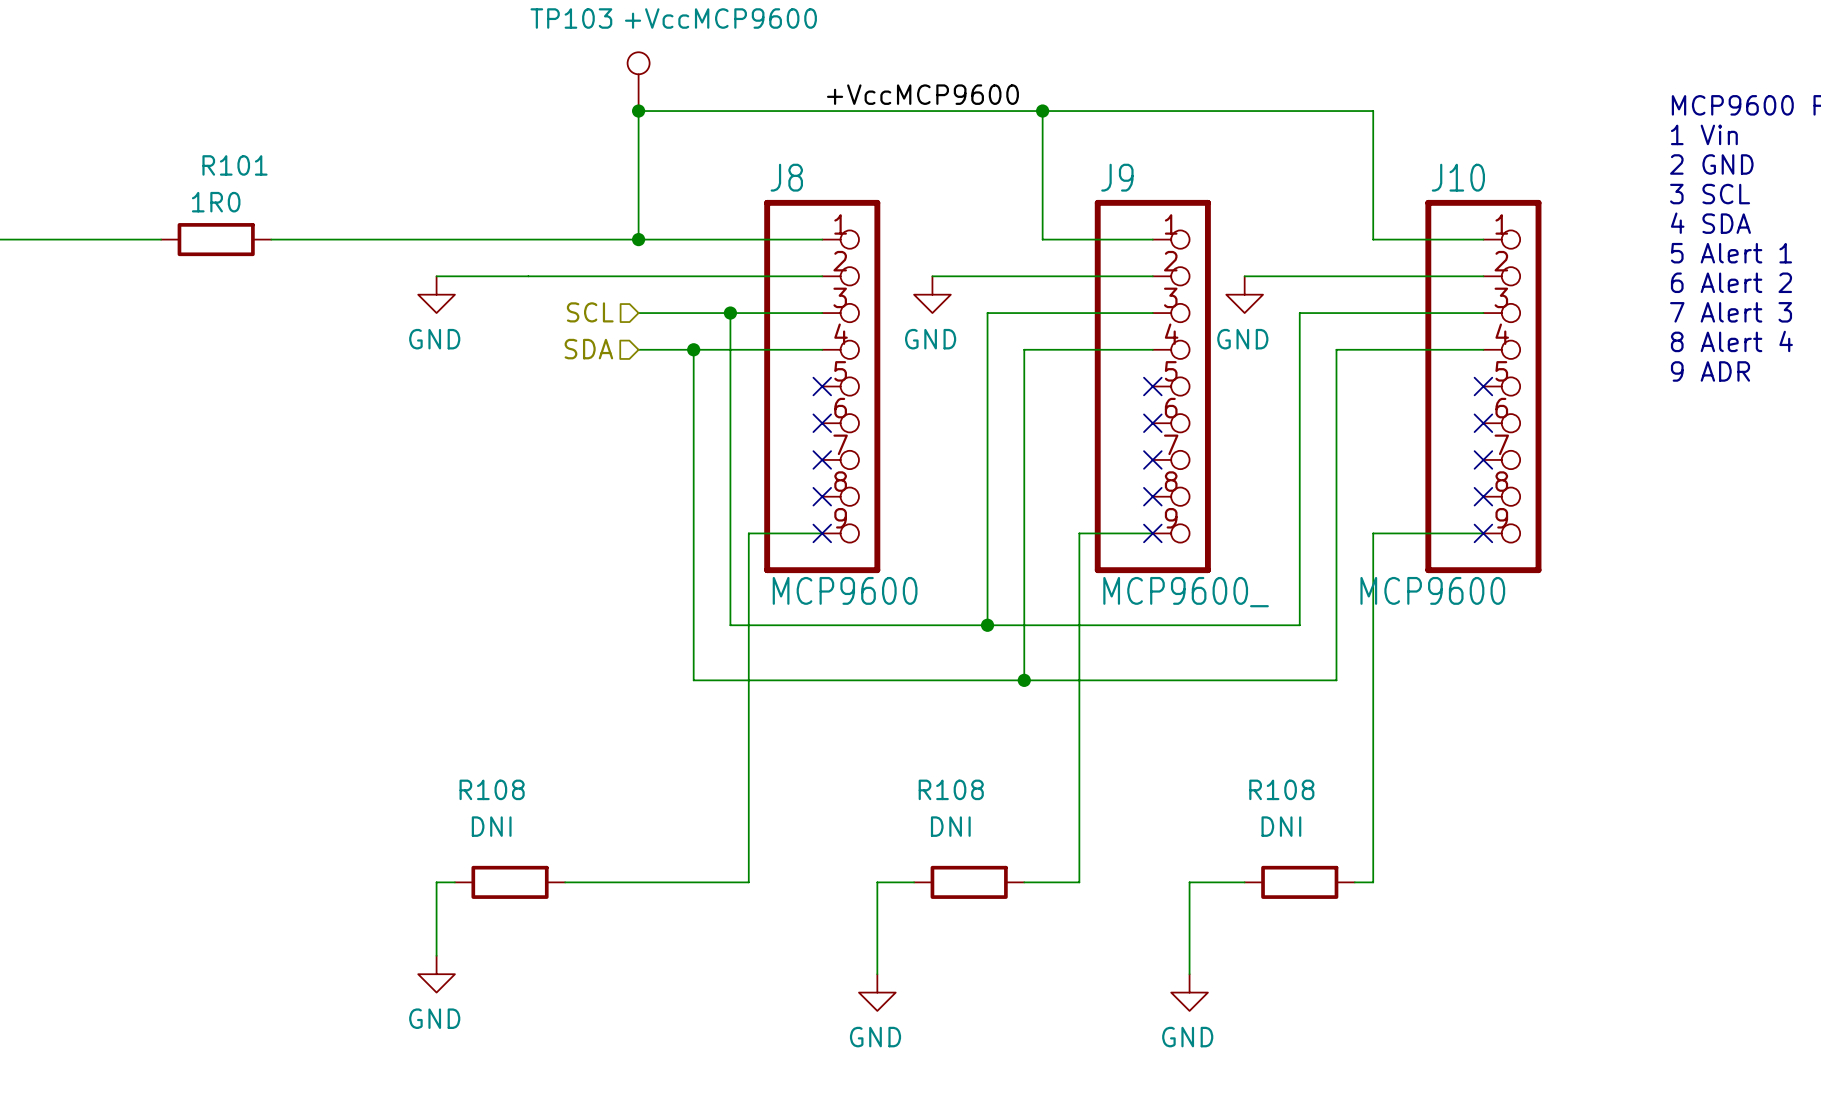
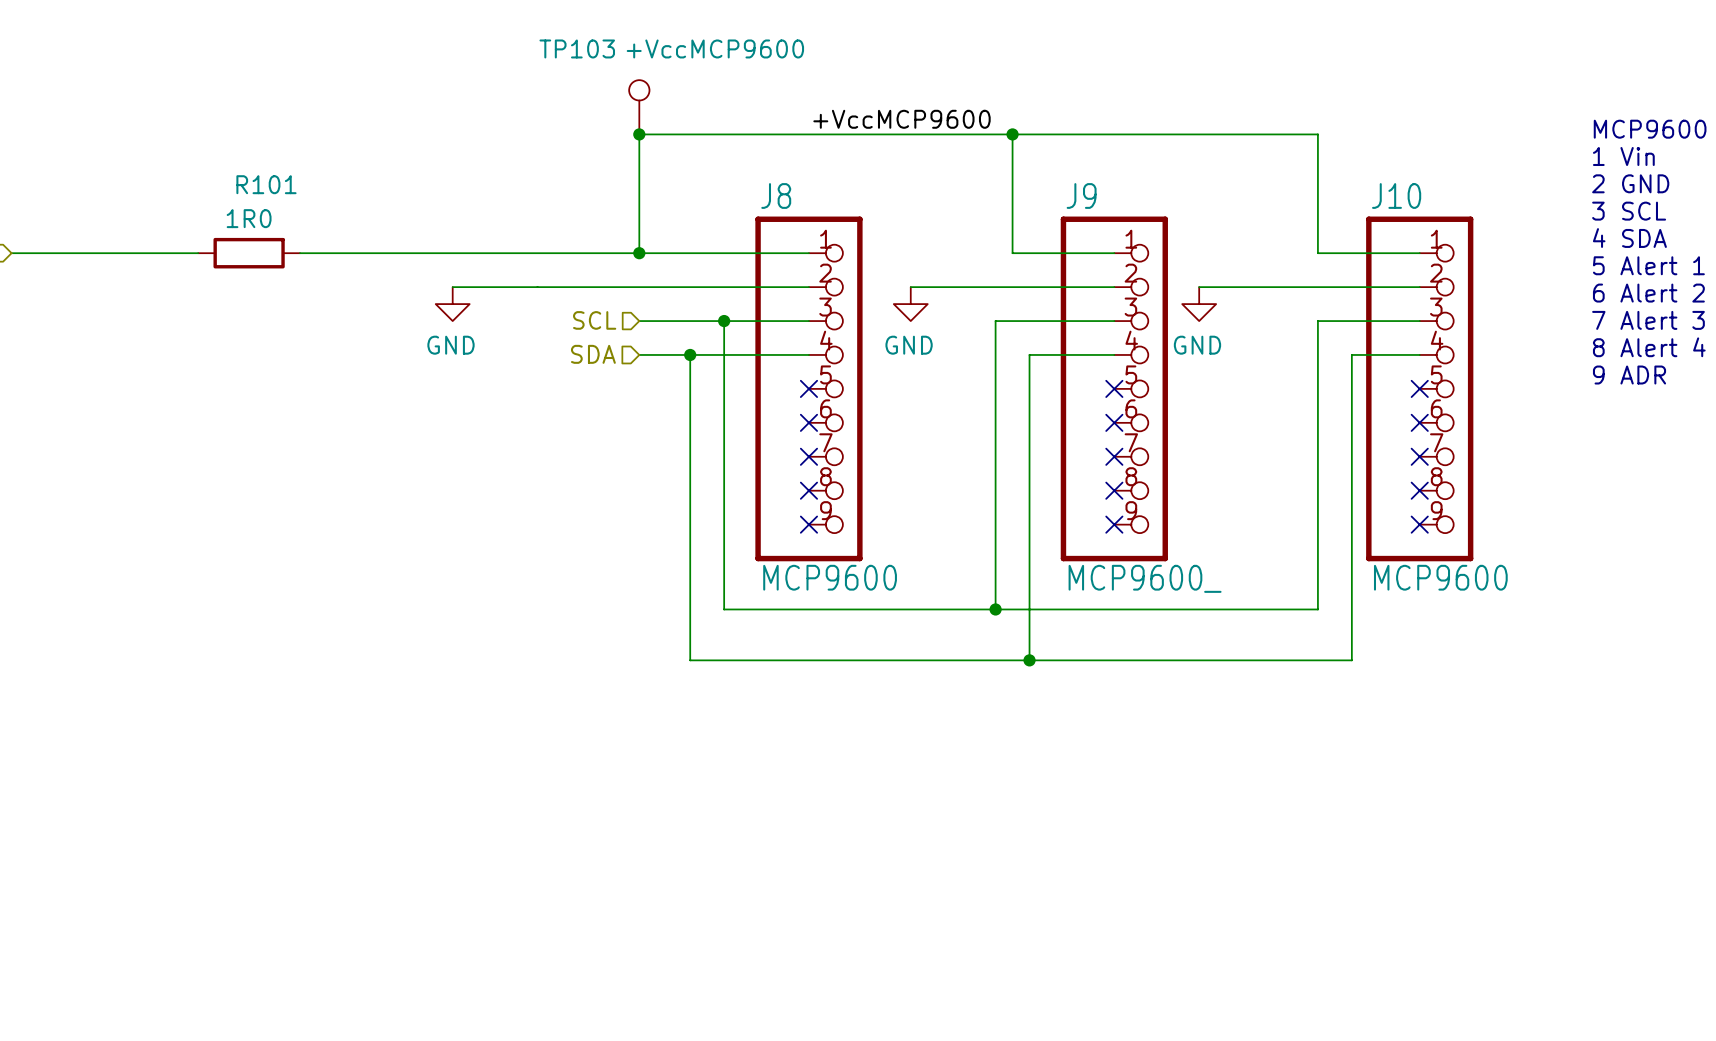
wire: (1024, 313) (987, 313) (987, 625) -> none
wire: (1373, 313) (1299, 313) (1299, 625) -> (1317, 321) (1317, 524)
wire: (1024, 349) (1061, 349) -> (995, 354) (995, 321)
wire: none -> (1029, 354) (1029, 660)
wire: (1409, 349) (1336, 349) (1336, 680) -> (1351, 354) (1351, 660) (1284, 660)
wire: (822, 533) (748, 533) (748, 882) (565, 882) -> none
wire: (1152, 533) (1079, 533) (1079, 882) (1024, 882) -> none
wire: (1373, 533) (1483, 533) -> none
J10 value position: MCP9600 (1432, 590) -> MCP9600 (1440, 577)
junction: (987, 625) -> none
wire: (1024, 625) (1024, 680) -> none
junction: none -> (995, 609)
wire: (1373, 625) (1373, 882) (1354, 882) -> (1317, 609) (1250, 609)
junction: (1024, 680) -> none
junction: none -> (1029, 660)
wire: (454, 882) (436, 882) (436, 955) -> none
R108: DNI (510, 882) -> none
wire: (914, 882) (877, 882) (877, 974) -> none
R108: DNI (969, 882) -> none
wire: (1244, 882) (1189, 882) (1189, 974) -> none
R108: DNI (1299, 882) -> none
power symbol: GND (436, 974) -> none
power symbol: GND (877, 992) -> none
power symbol: GND (1189, 992) -> none

